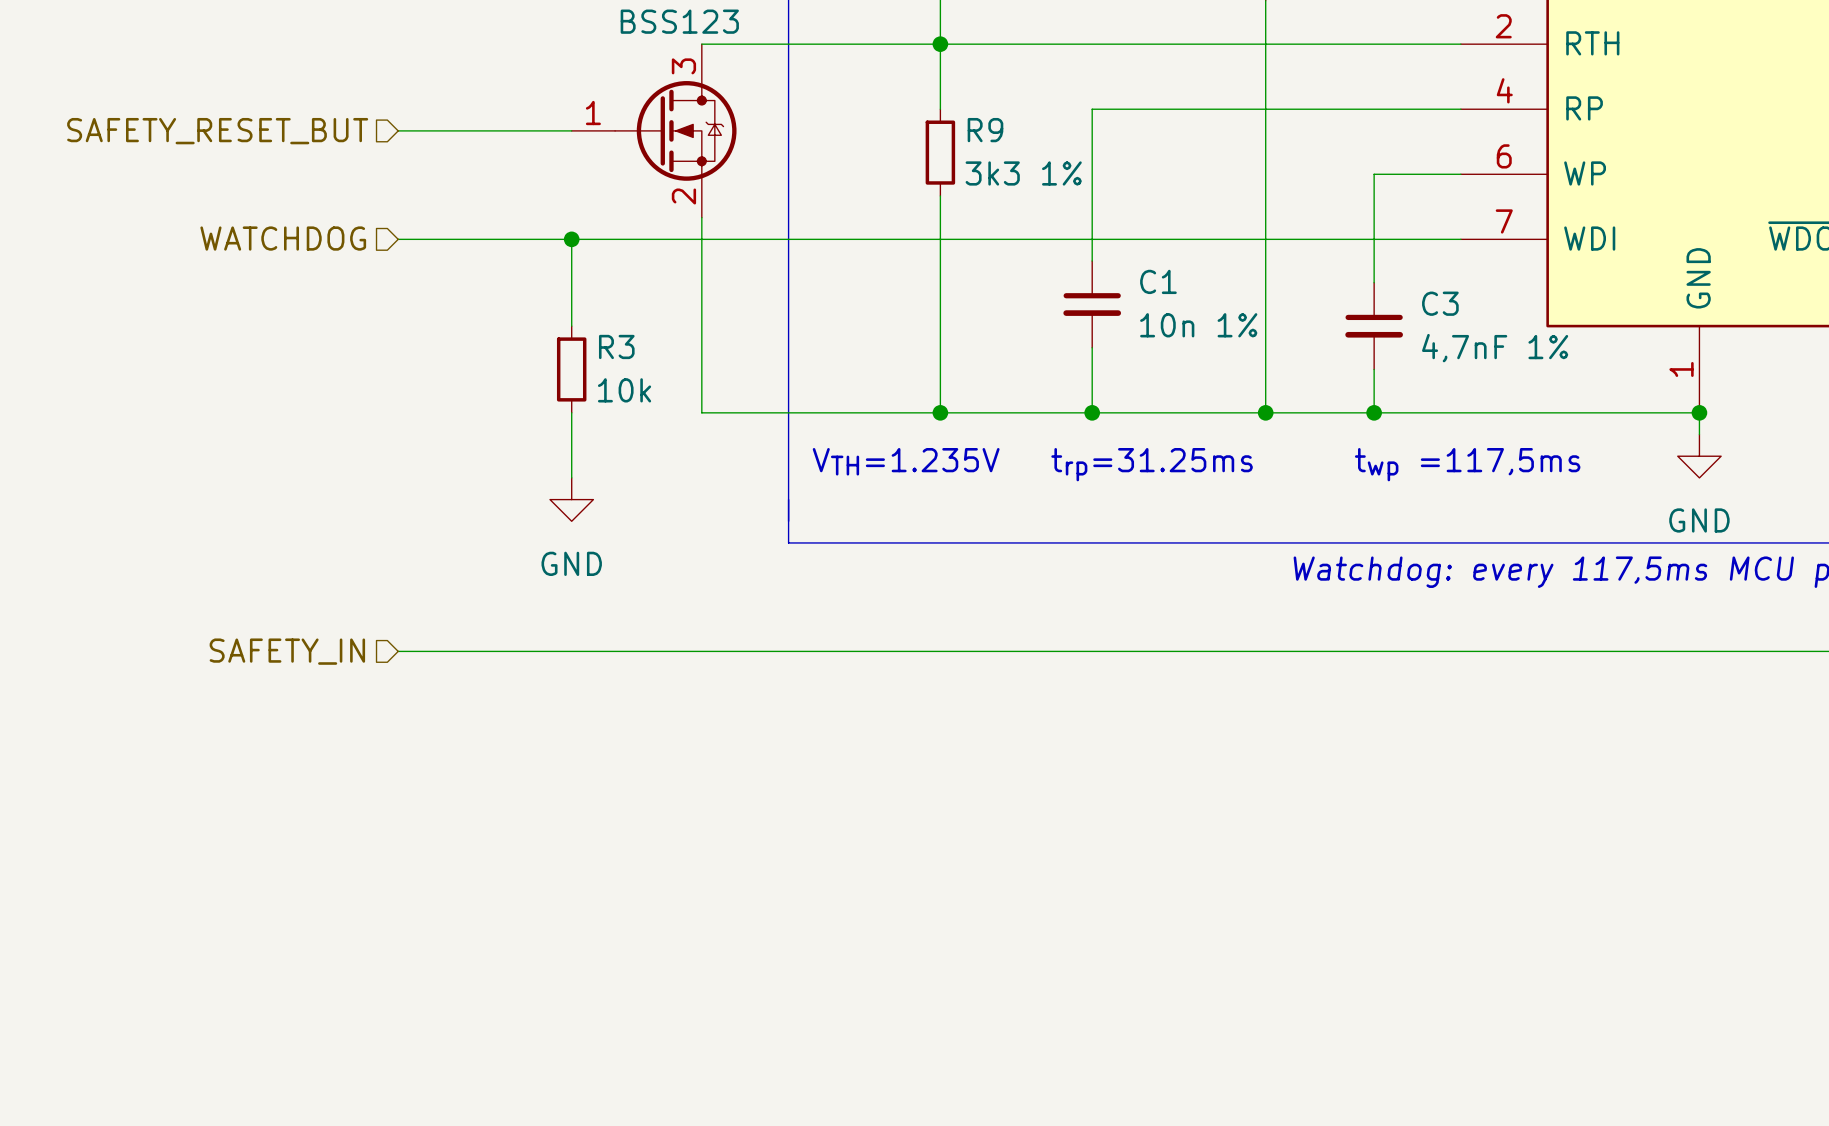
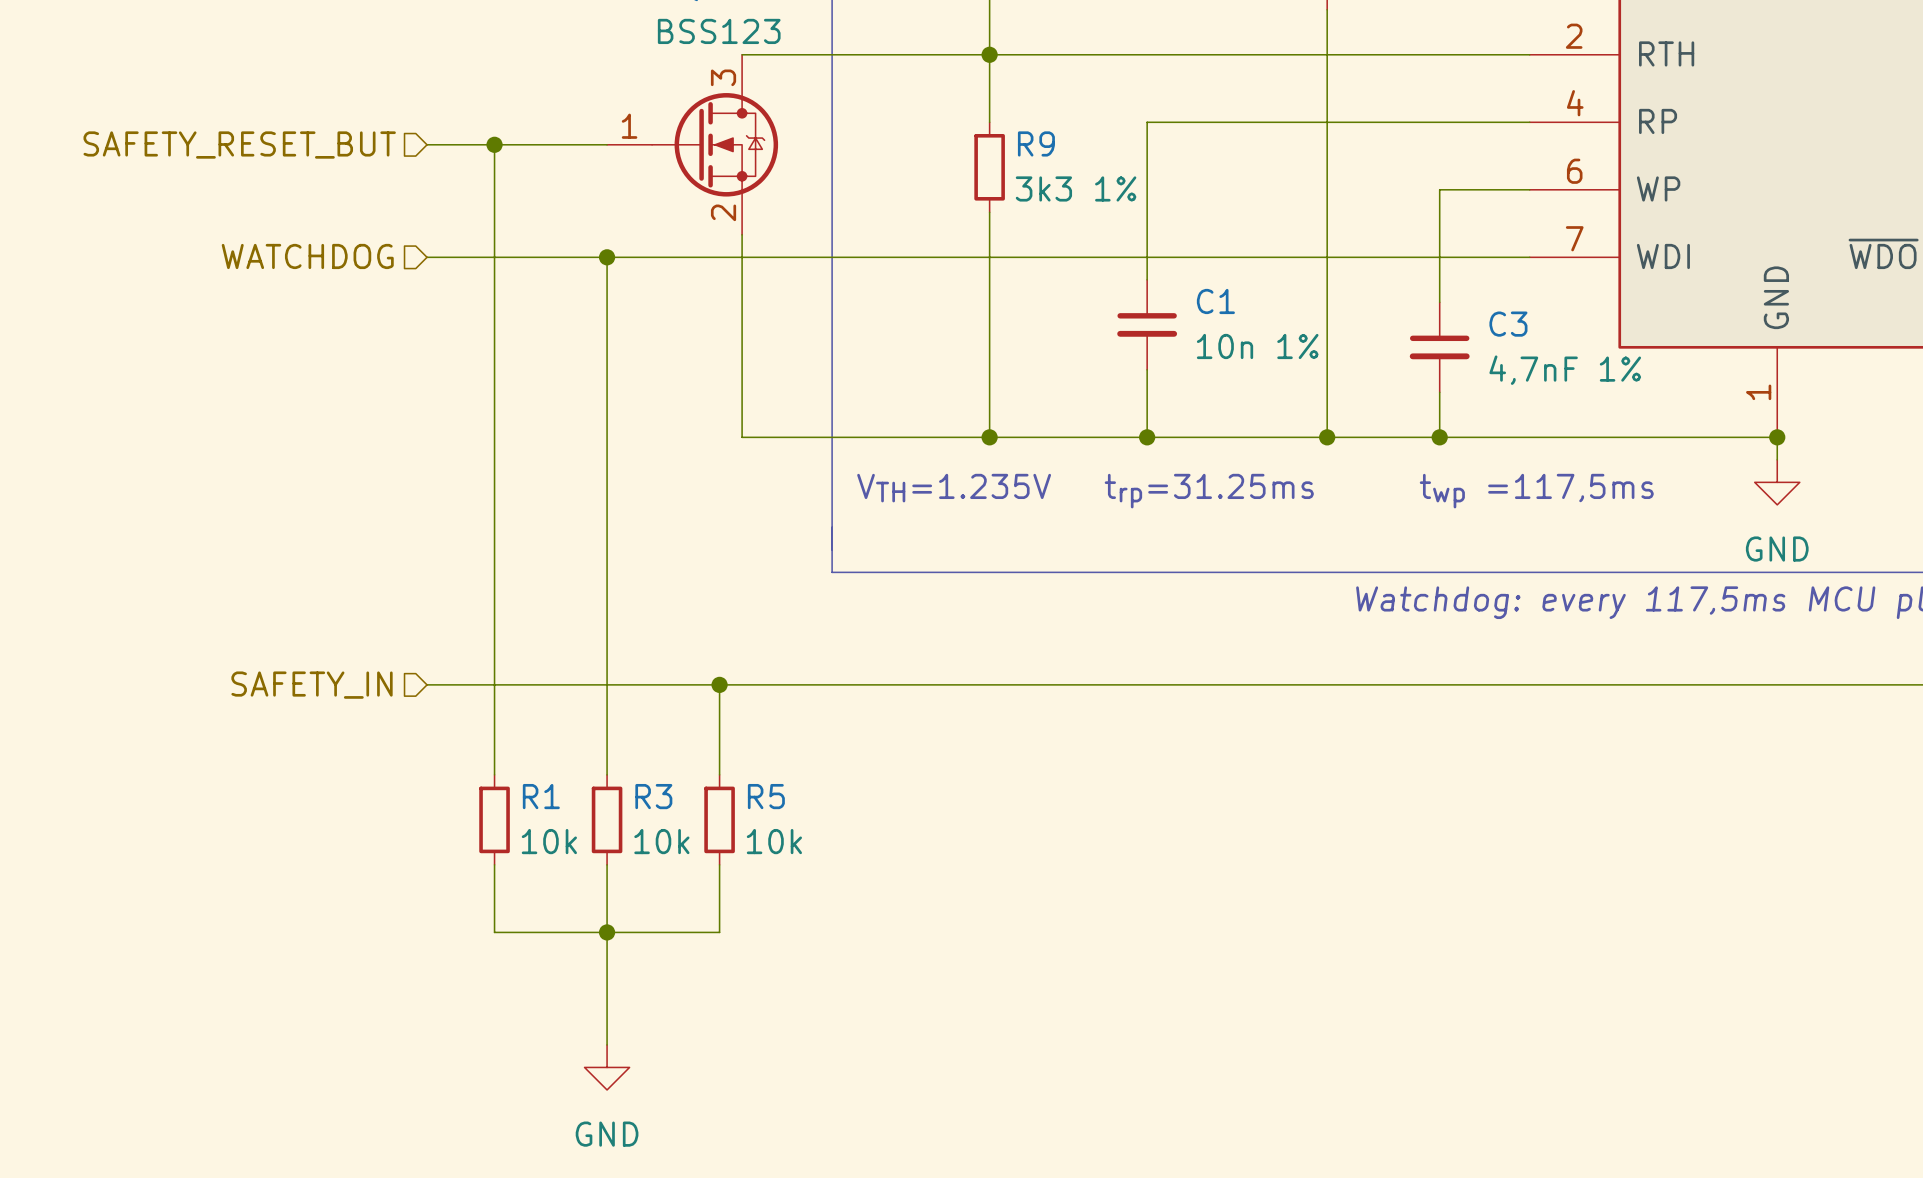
wire: none -> (494, 144) (494, 774)
junction: none -> (494, 144)
wire: none -> (607, 347) (607, 437)
R3 position: (571, 369) -> (607, 819)
wire: none -> (607, 504) (607, 774)
power symbol: GND (571, 499) -> none
wire: none -> (719, 684) (719, 774)
junction: none -> (719, 684)
R1: none -> 10k (494, 819)
R5: none -> 10k (719, 819)
wire: none -> (494, 864) (494, 932) (719, 932) (719, 864)
wire: none -> (607, 864) (607, 1044)
junction: none -> (607, 932)
power symbol: none -> GND (607, 1067)

